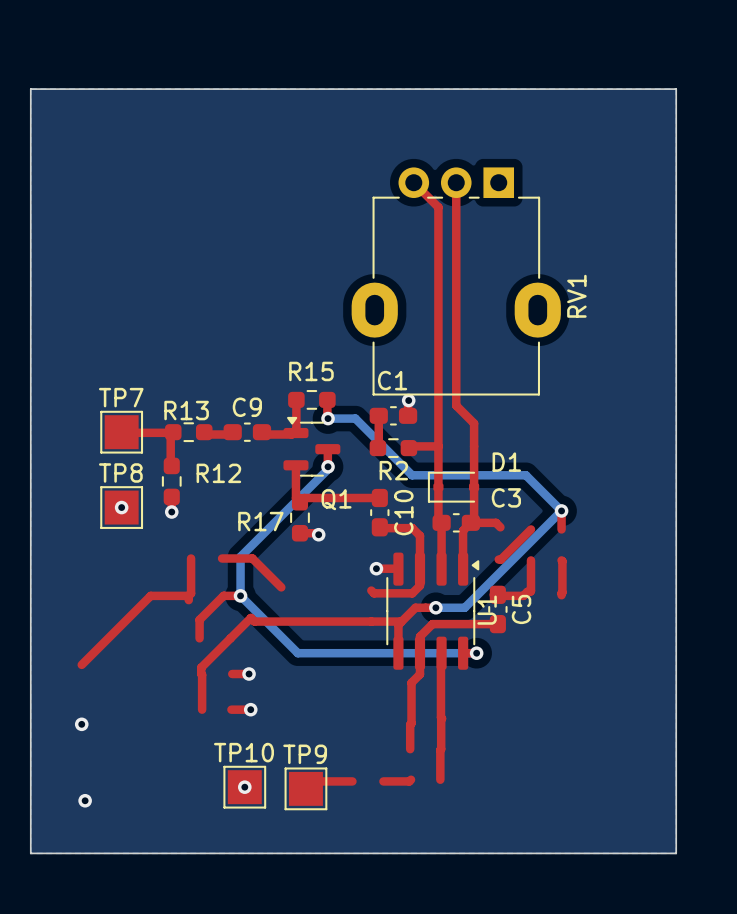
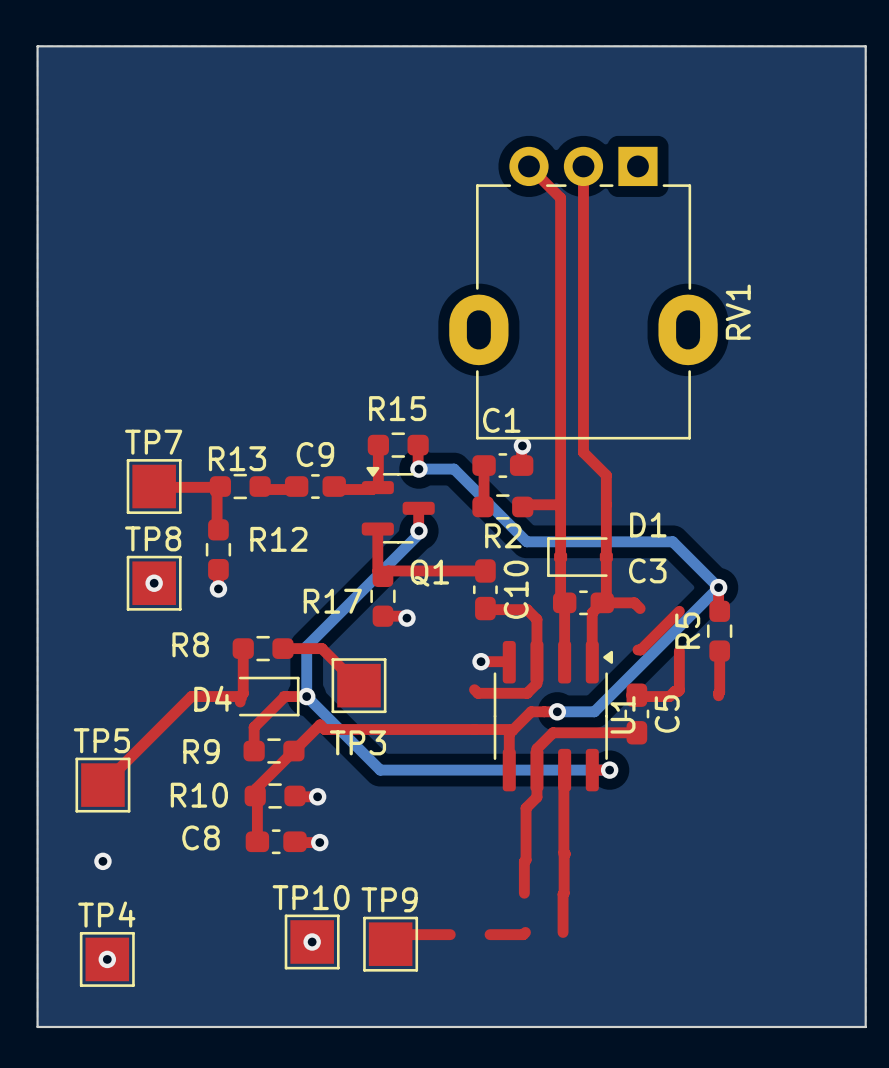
R5: none -> (719, 631)
R8: none -> (263, 648)
TP3: none -> (359, 685)
D4: none -> (266, 696)
R9: none -> (274, 751)
TP5: none -> (102, 785)
R10: none -> (275, 795)
C8: none -> (276, 841)
TP4: none -> (107, 959)

